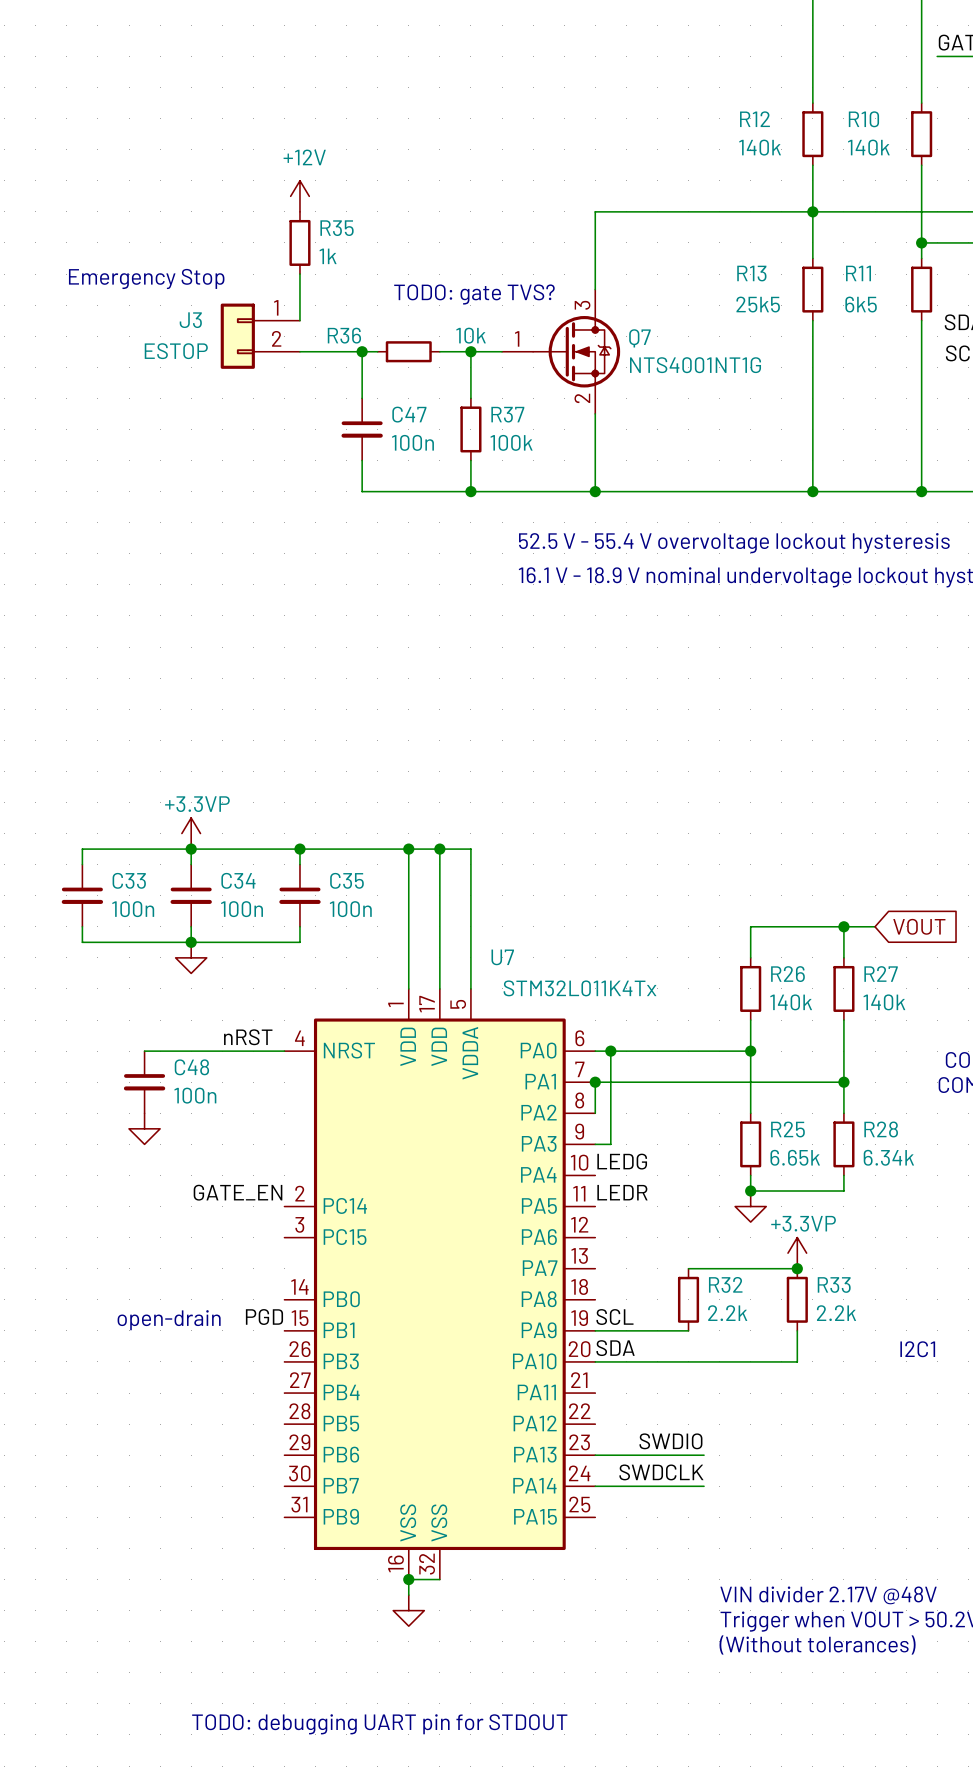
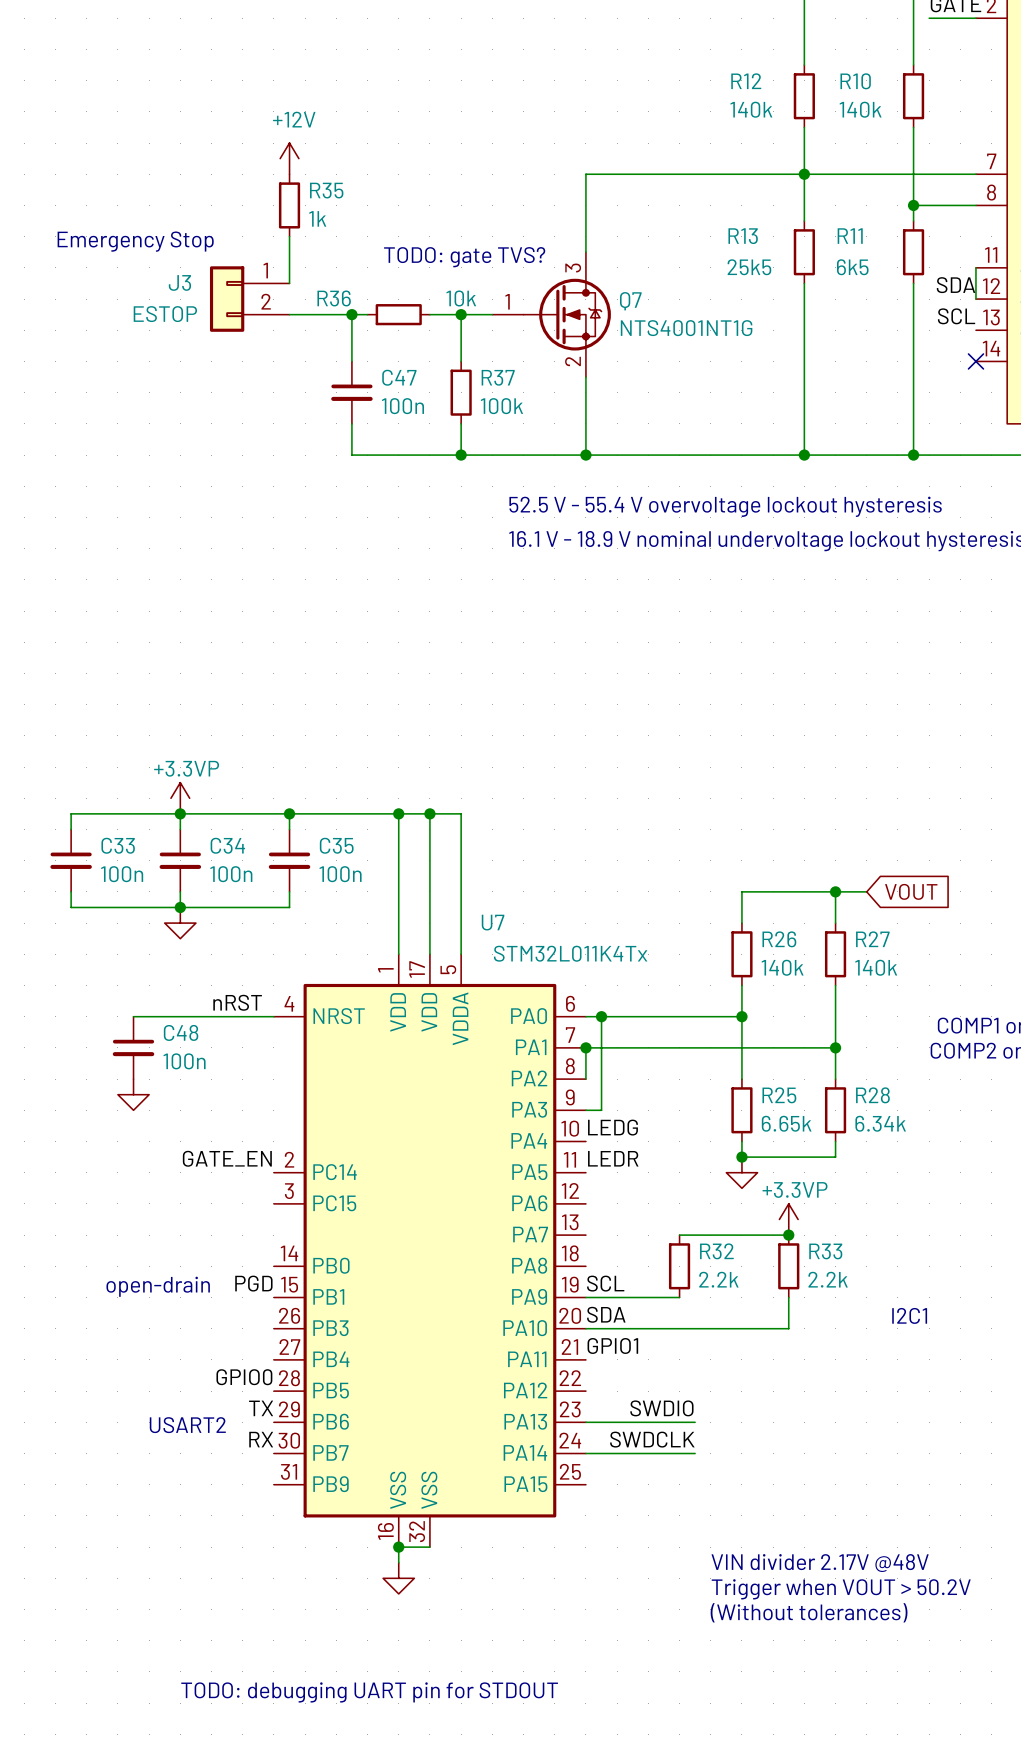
label: none -> GPIO1 (612, 1345)
label: none -> GPIO0 (244, 1377)
label: none -> TX (261, 1408)
text: none -> USART2 (187, 1425)
label: none -> RX (261, 1439)

